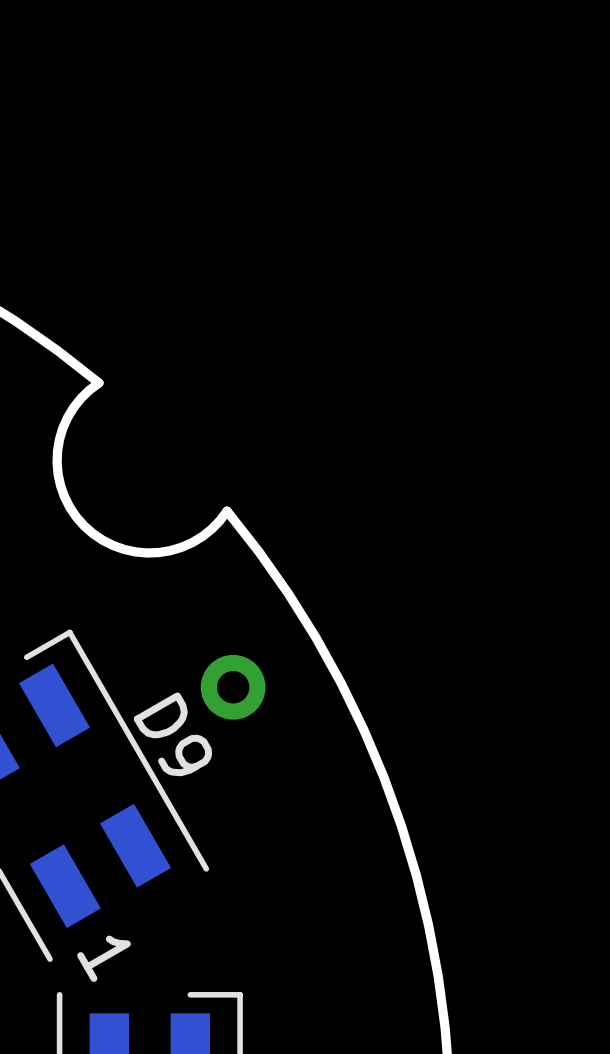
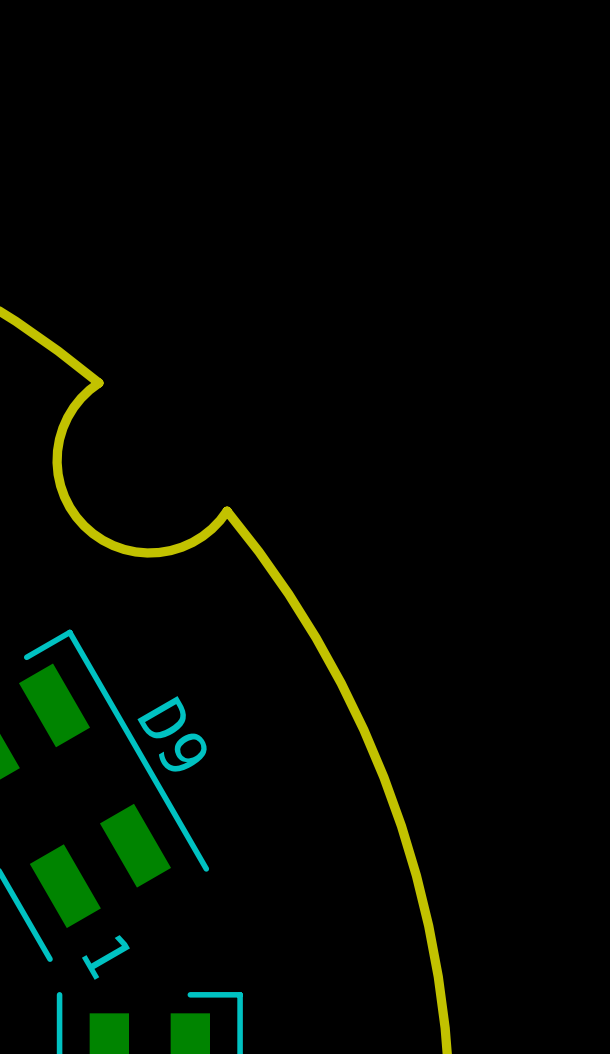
part: (233, 687) -> none

